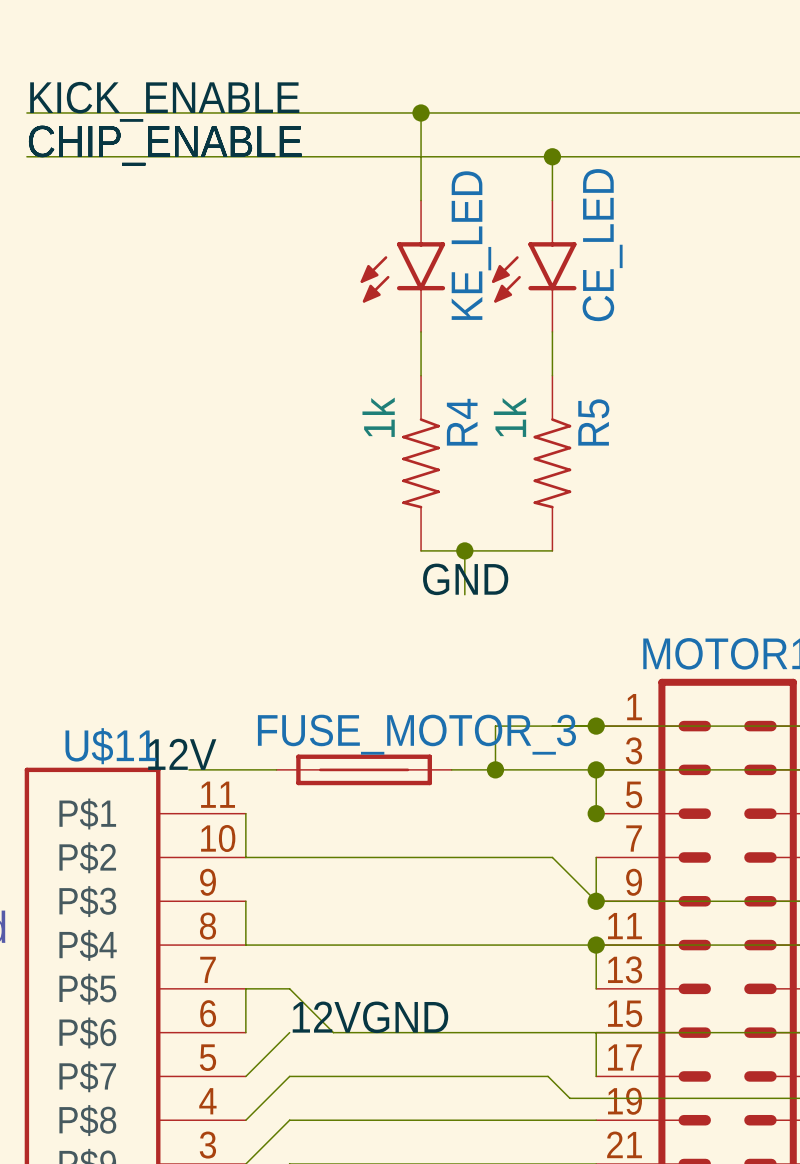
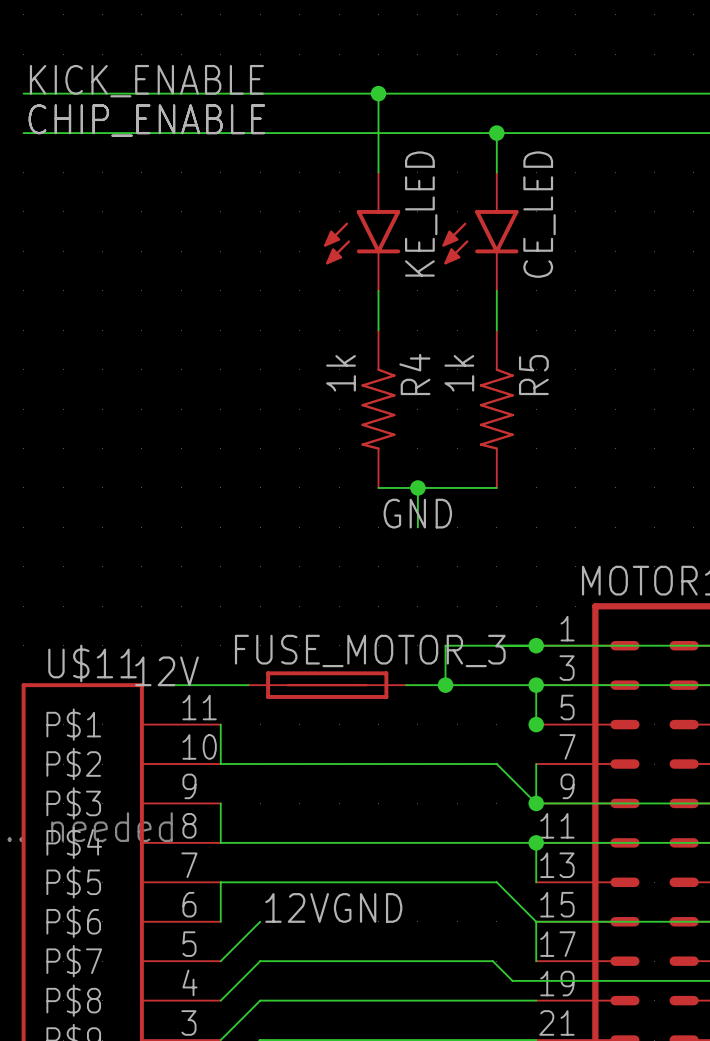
wire: (289, 988) (333, 1032) (596, 1032) -> (260, 882) (496, 882) (536, 921)

